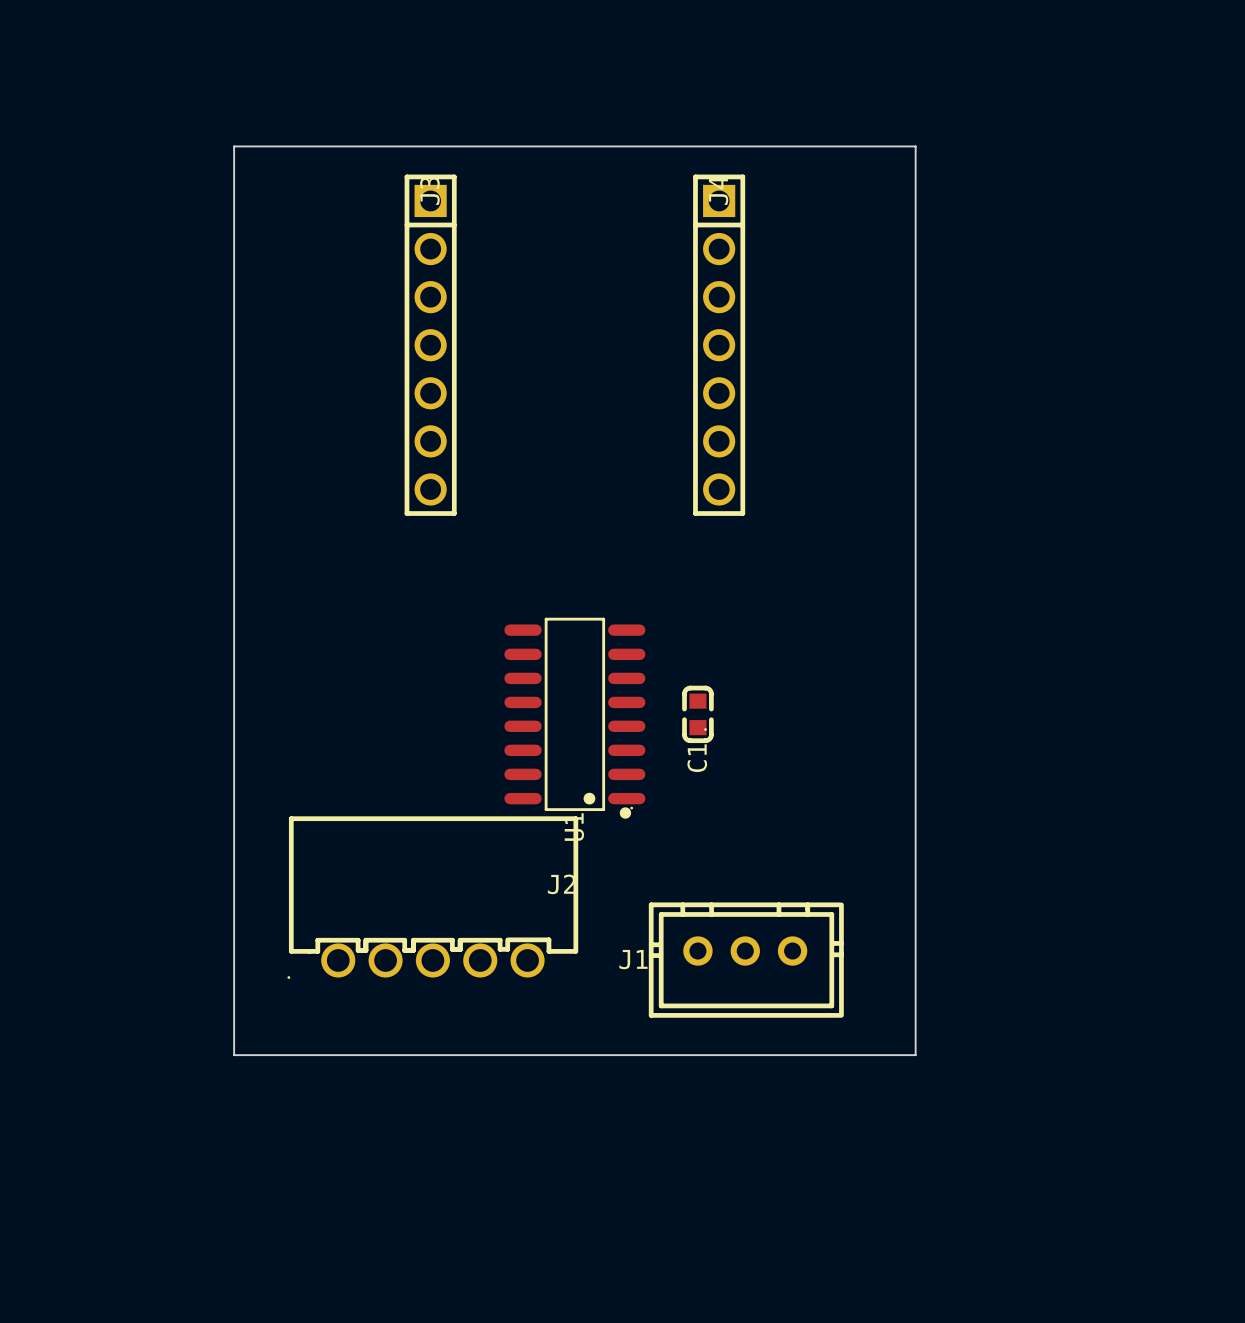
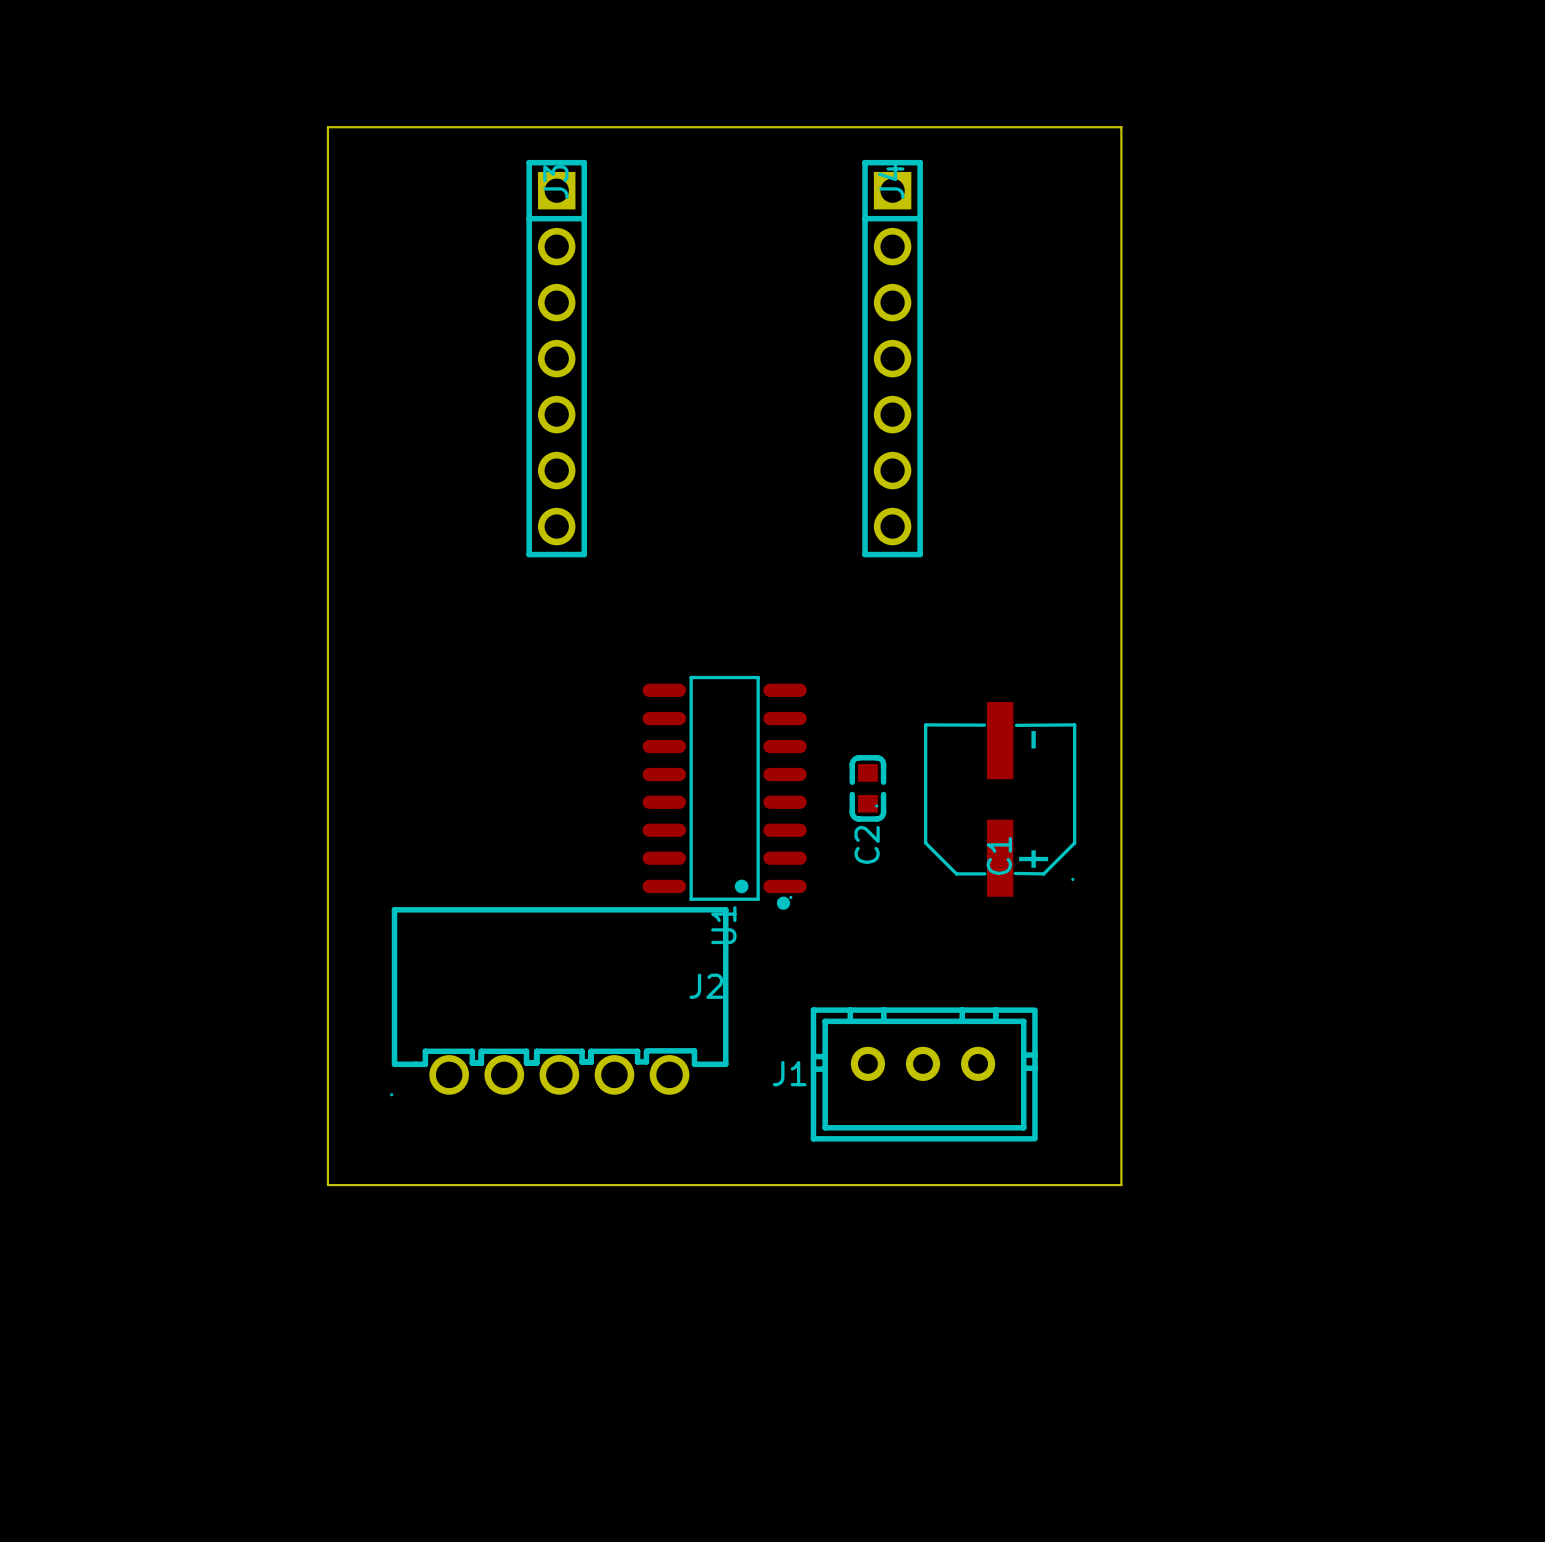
C1: none -> (1000, 799)
C1 name: C1 (697, 758) -> C2 (867, 844)

